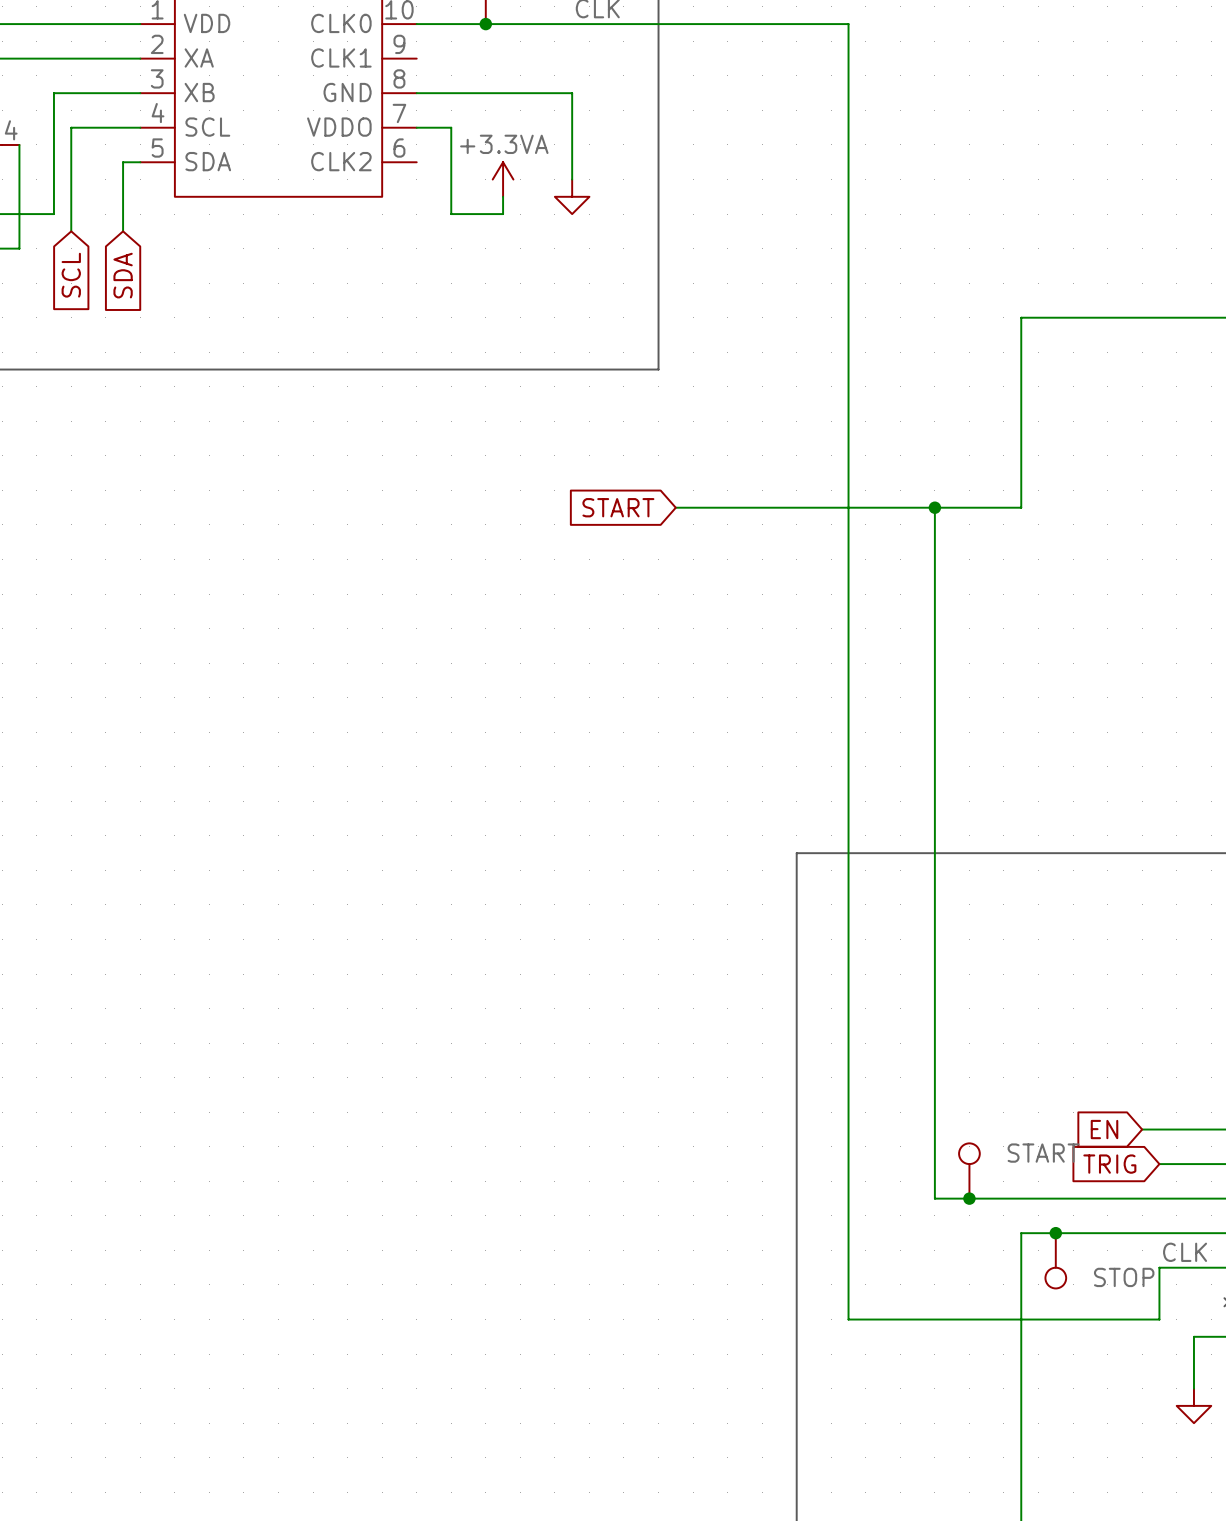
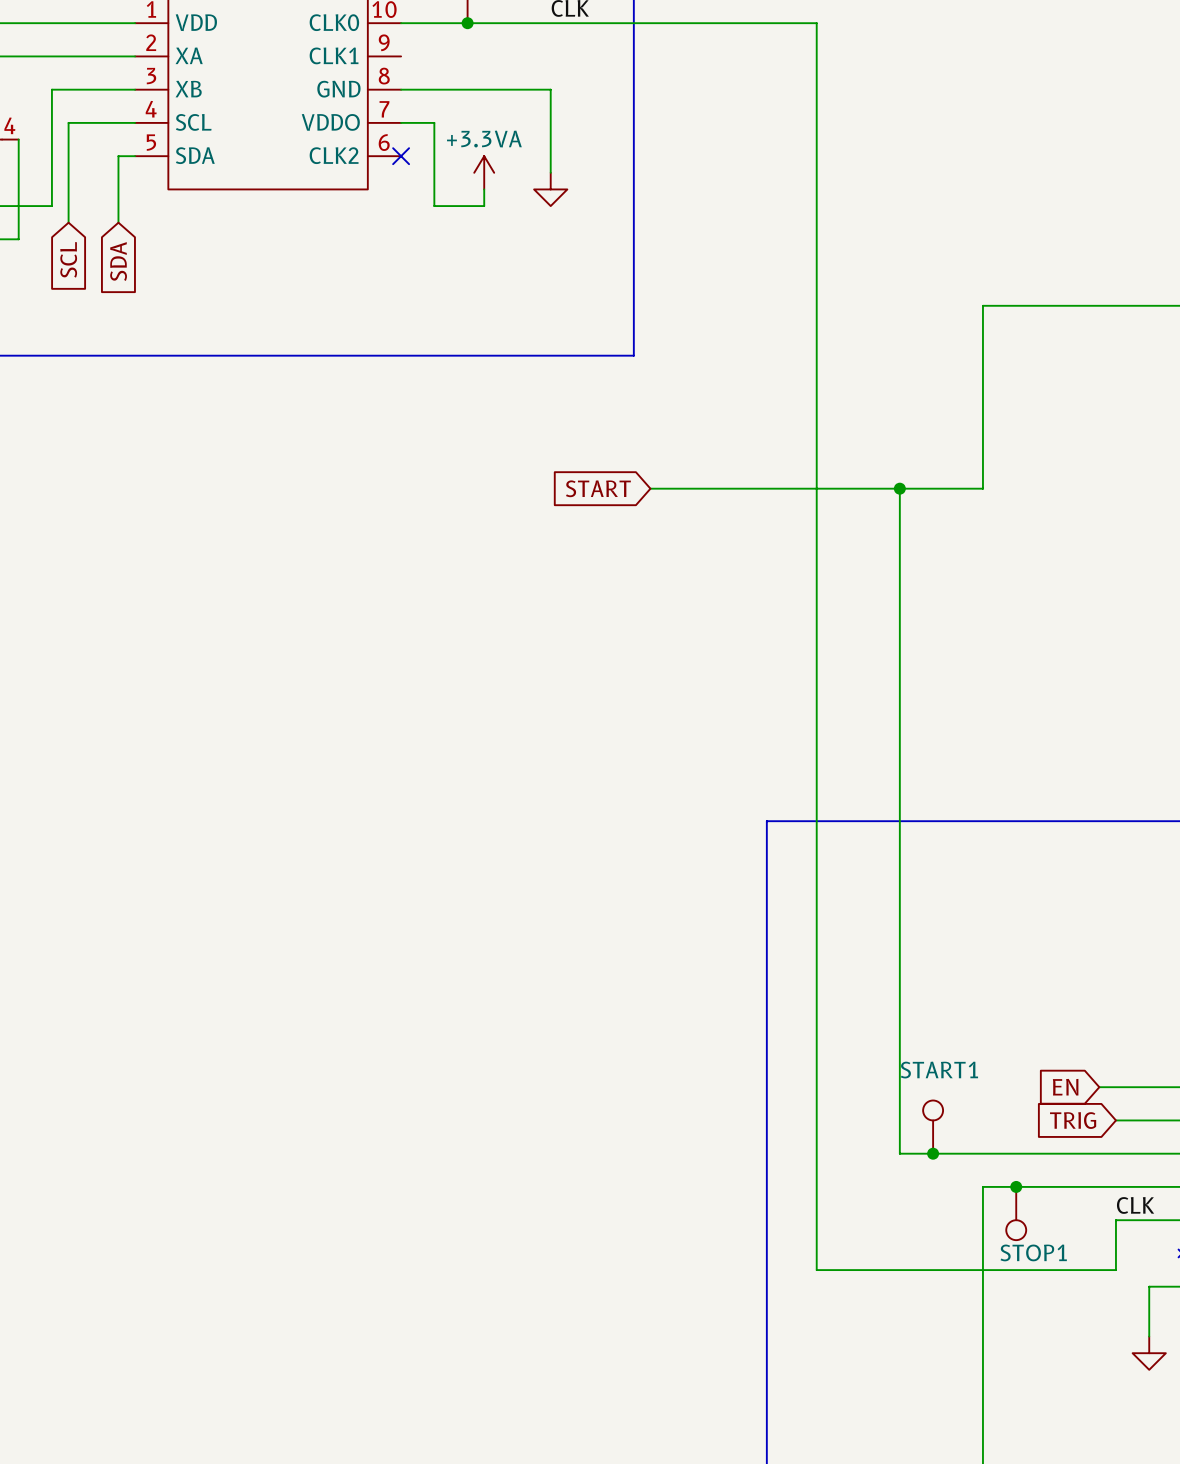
no-connect mark: none -> (401, 156)
START name: START (1043, 1153) -> START1 (939, 1070)
STOP name: STOP (1124, 1277) -> STOP1 (1033, 1252)

